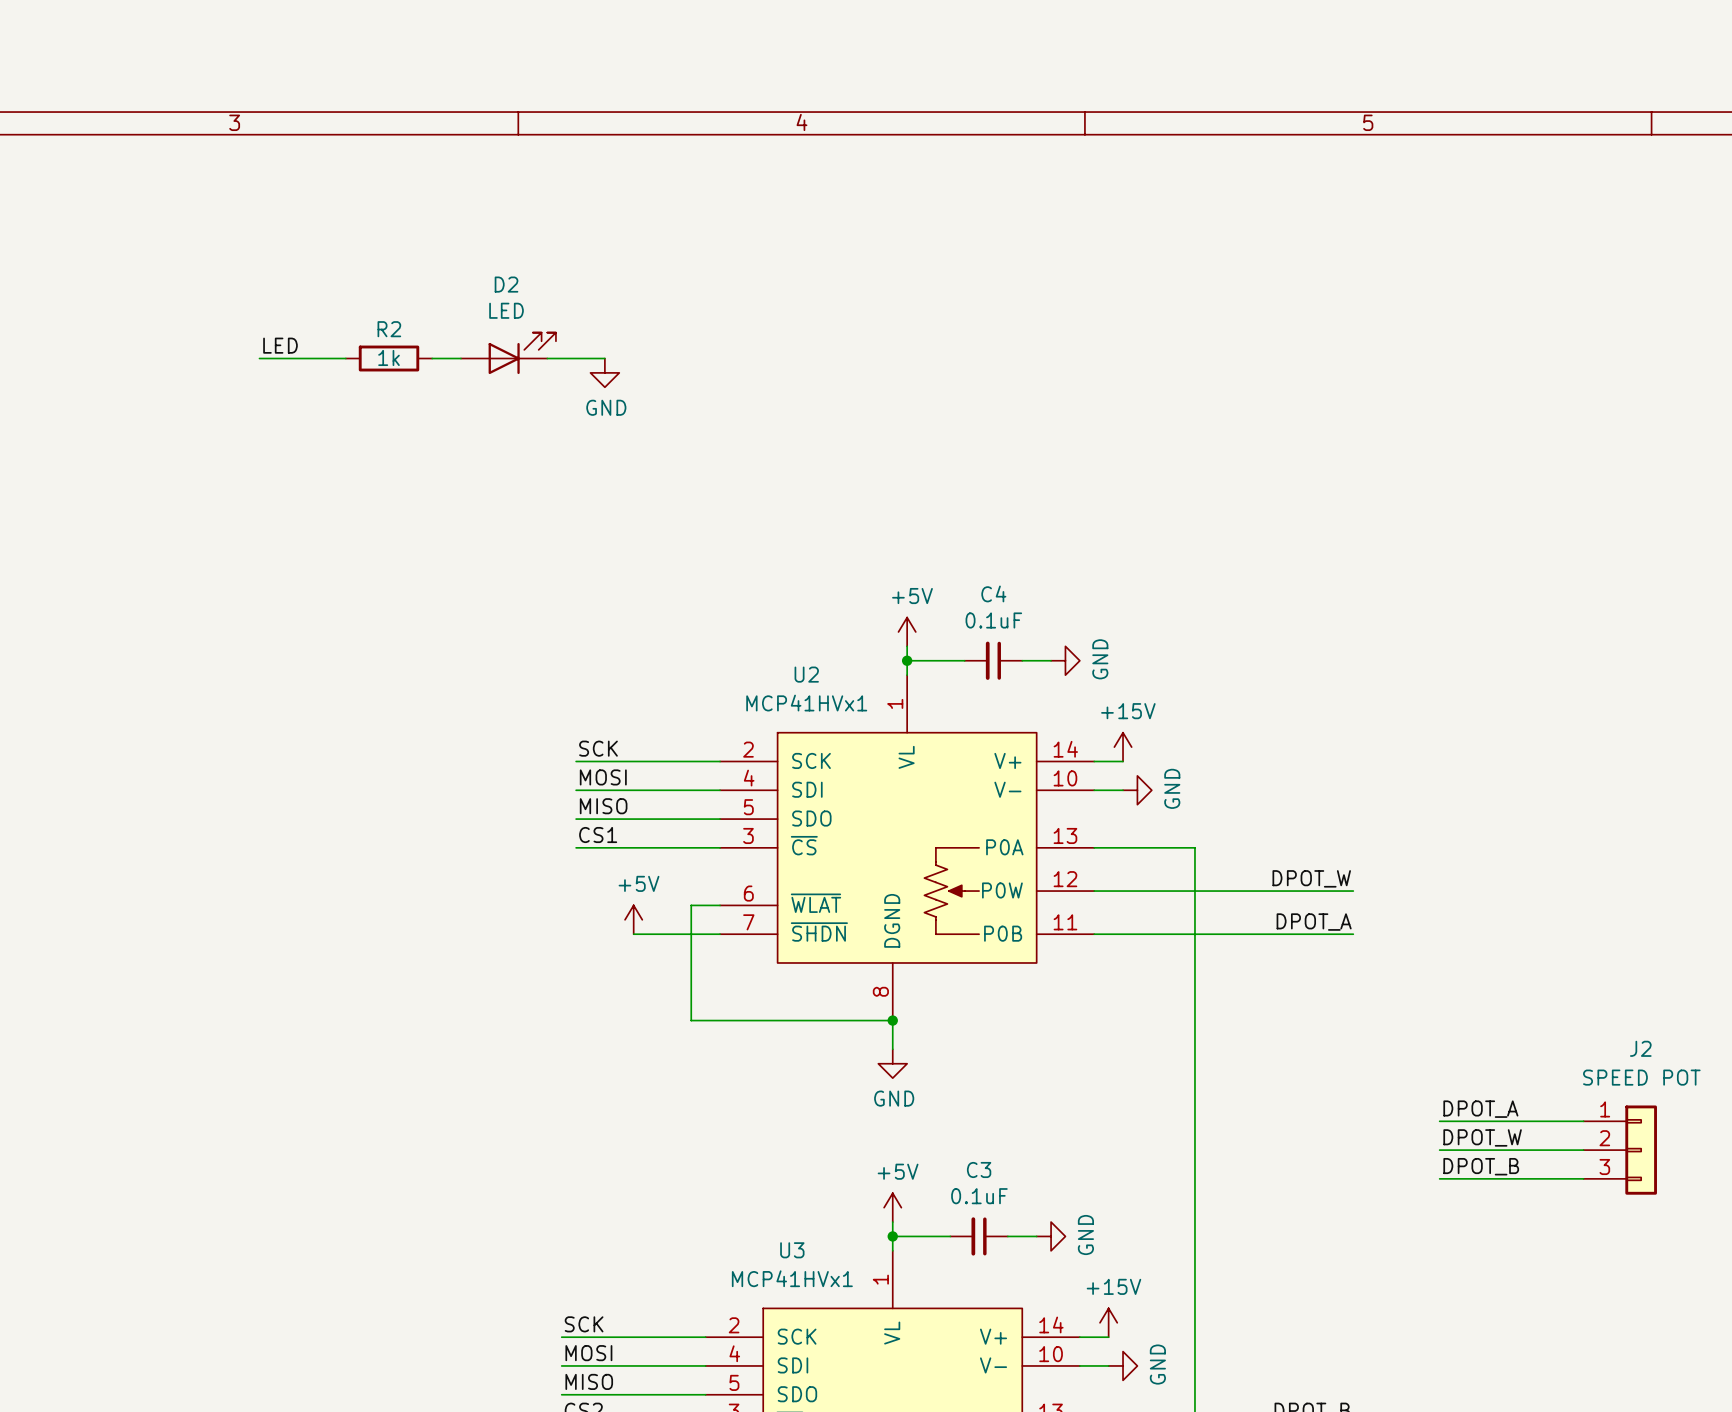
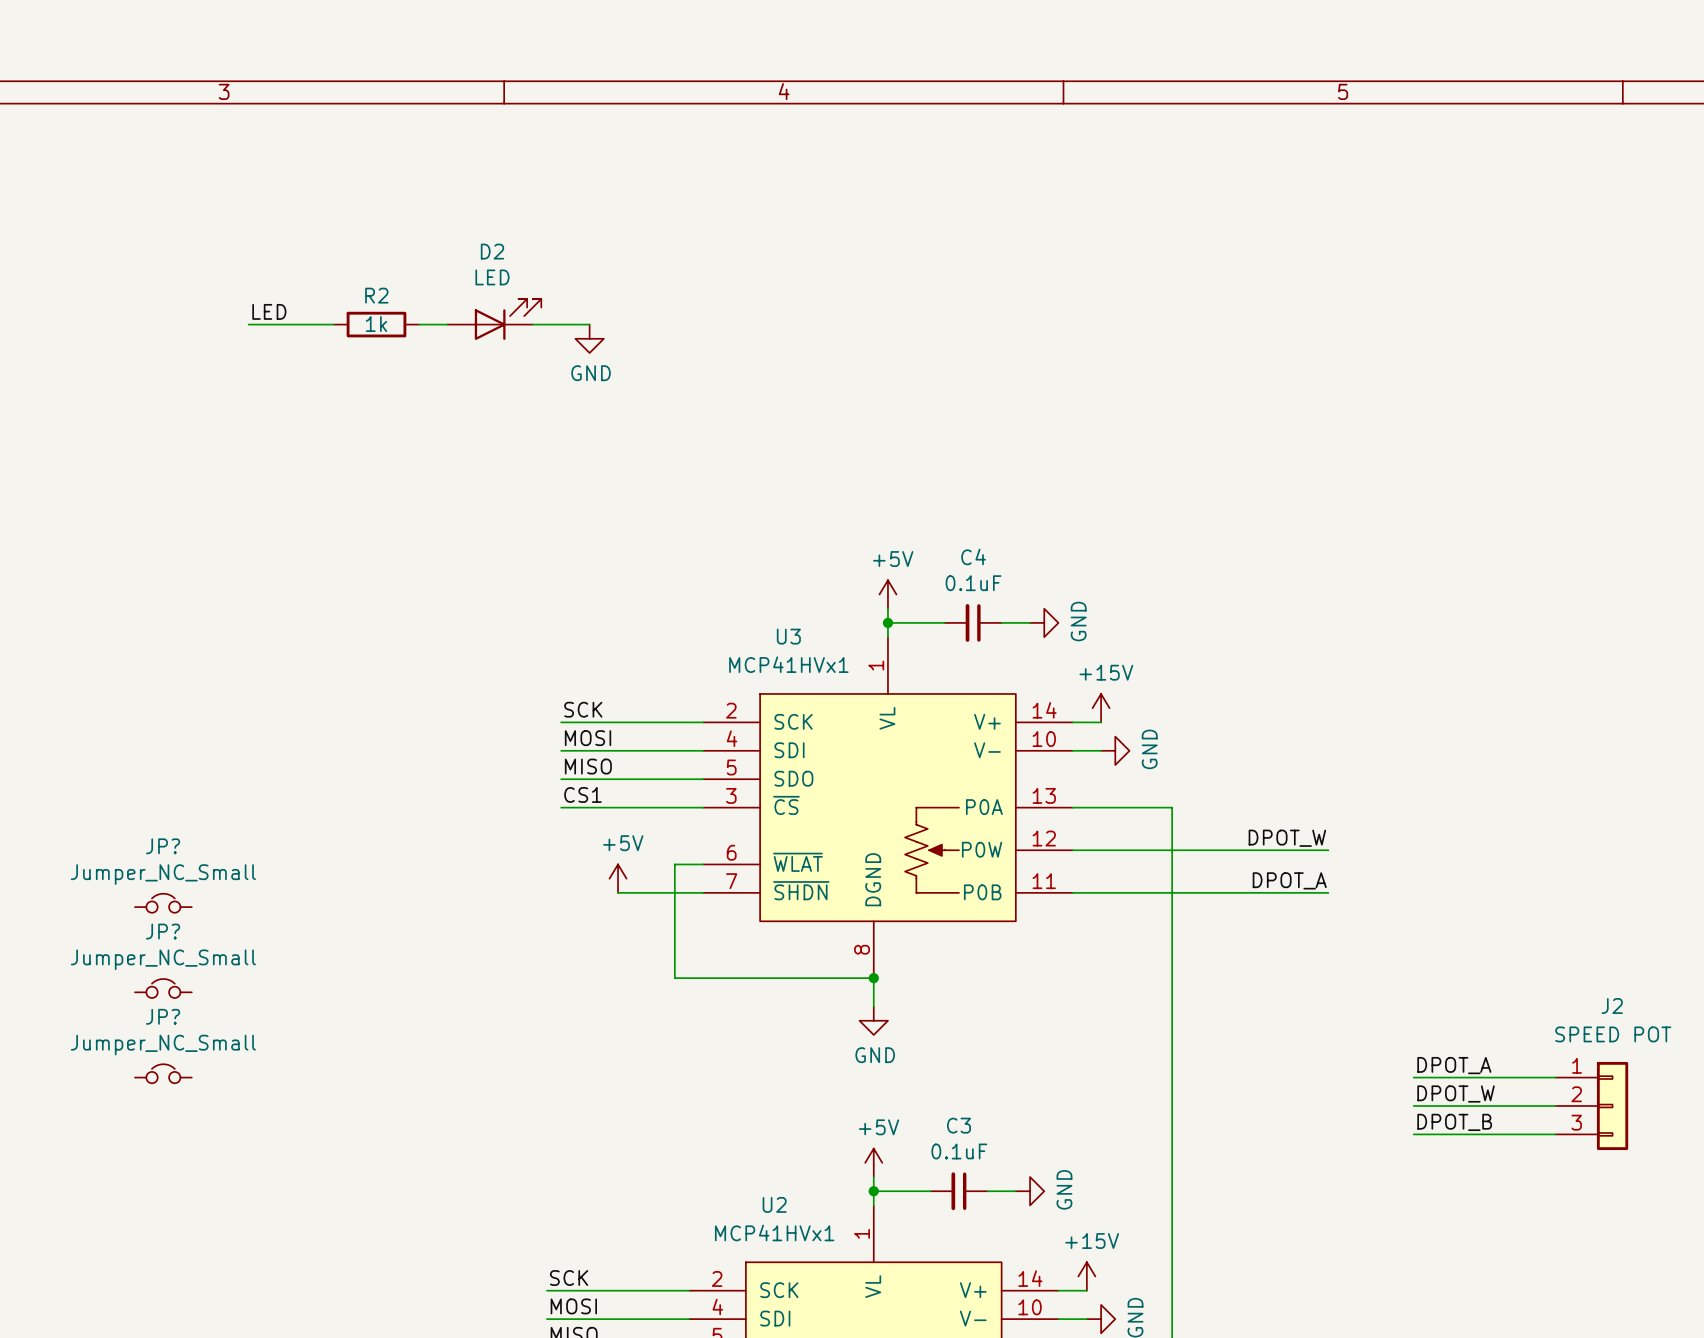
U2 name: U2 (806, 674) -> U3 (788, 636)
JP?: none -> Jumper_NC_Small (163, 903)
JP?: none -> Jumper_NC_Small (163, 988)
JP?: none -> Jumper_NC_Small (163, 1073)
U3 name: U3 (792, 1250) -> U2 (774, 1204)

